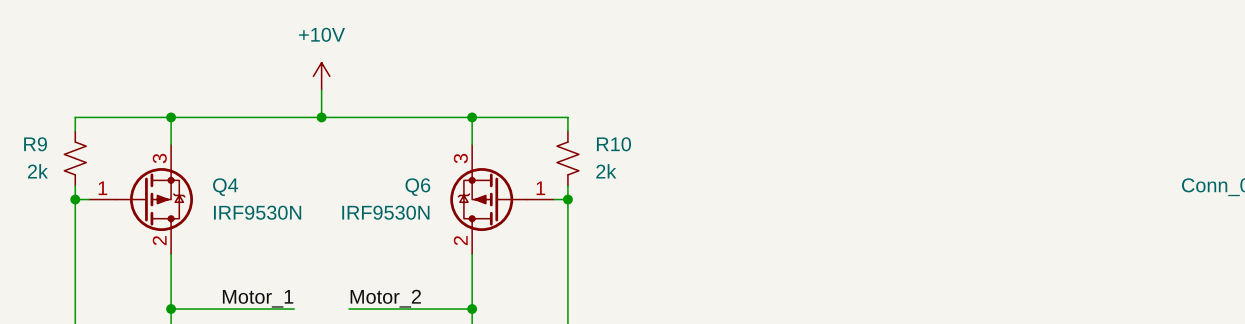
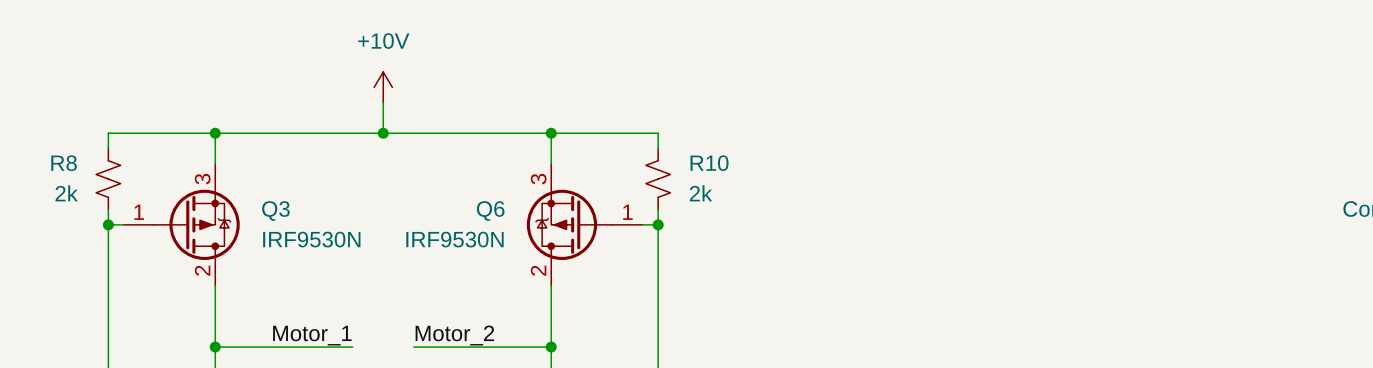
R9 name: R9 (35, 144) -> R8 (64, 163)
Q4 name: Q4 (225, 187) -> Q3 (275, 211)

